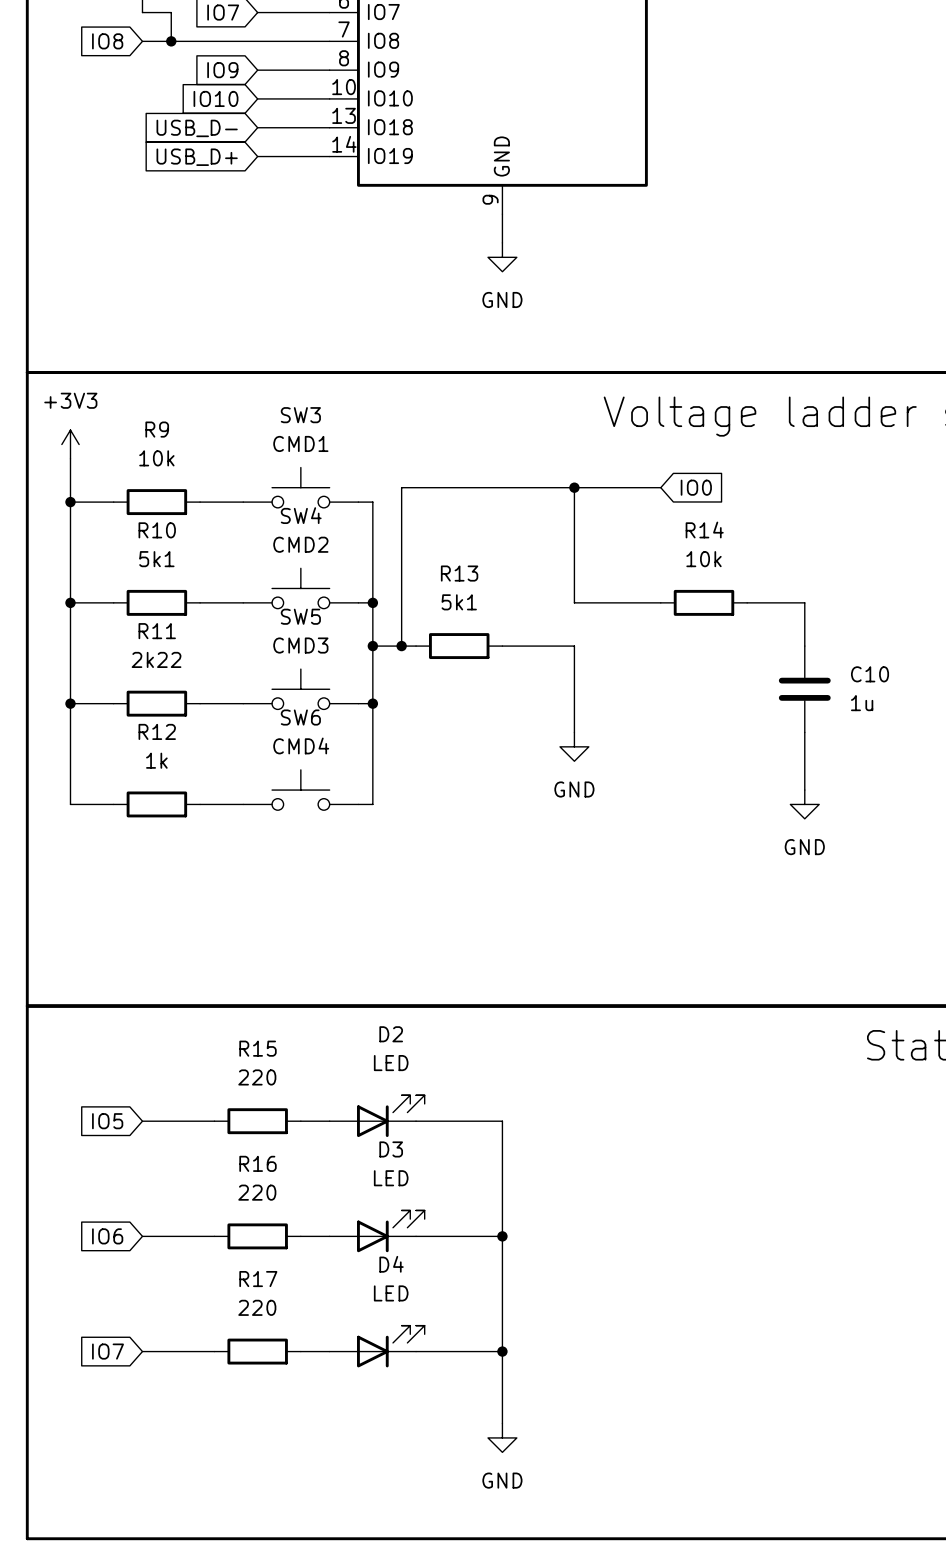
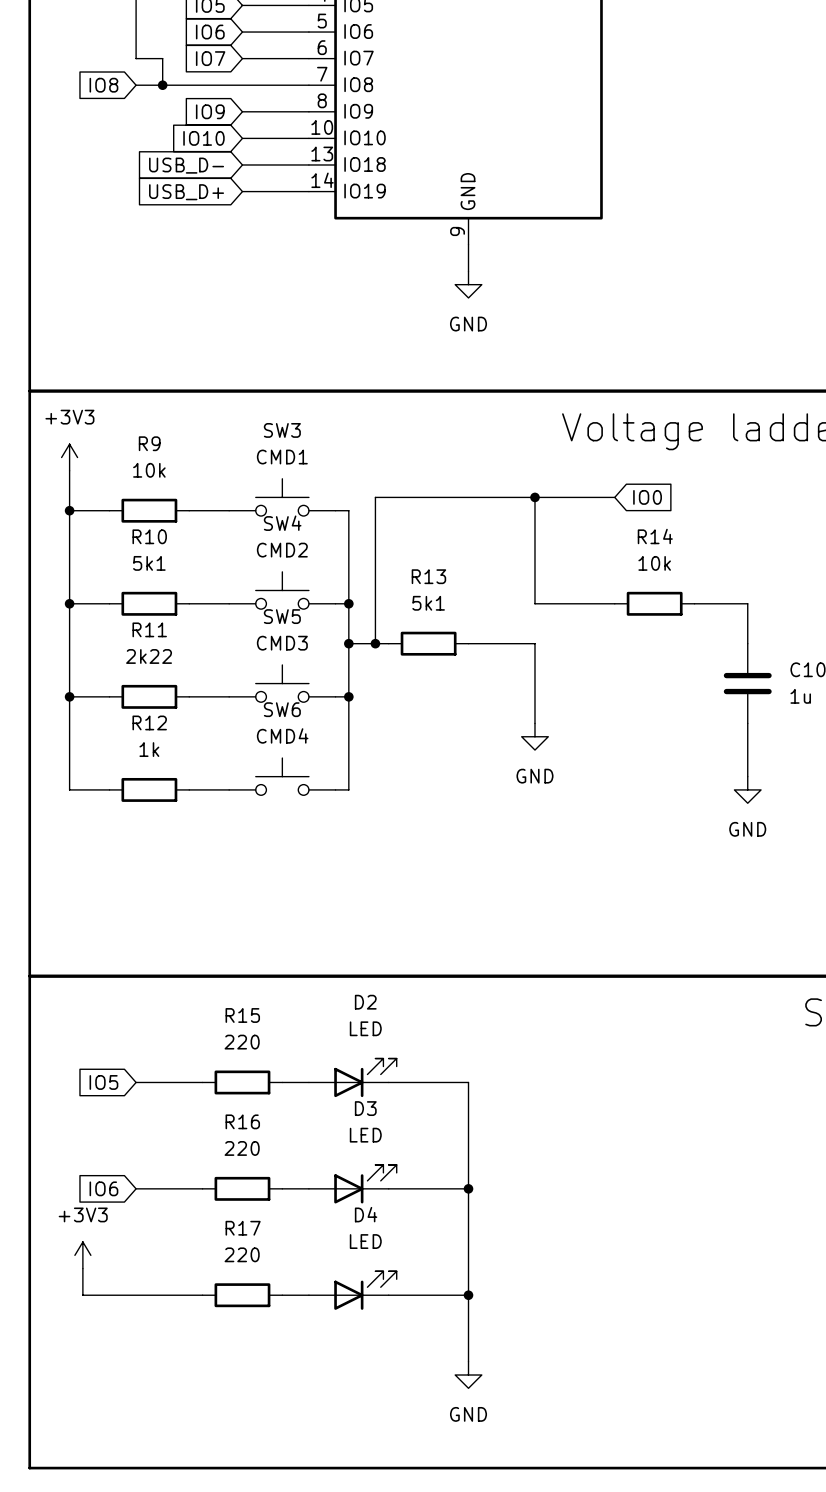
power symbol: none -> +3V3 (82, 1255)
wire: none -> (82, 1268) (82, 1295) (136, 1295)
global label: IO7 (108, 1351) -> none

